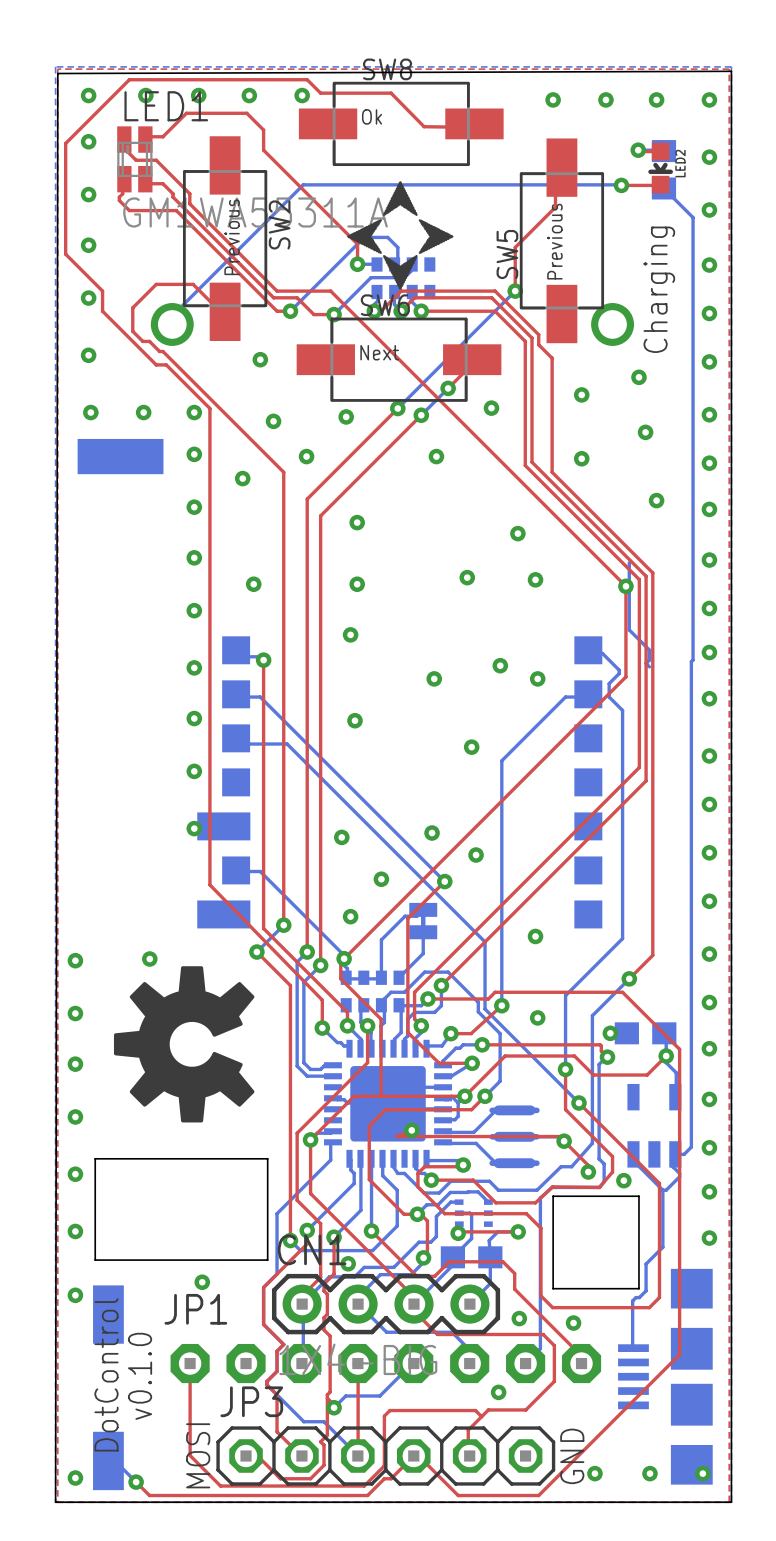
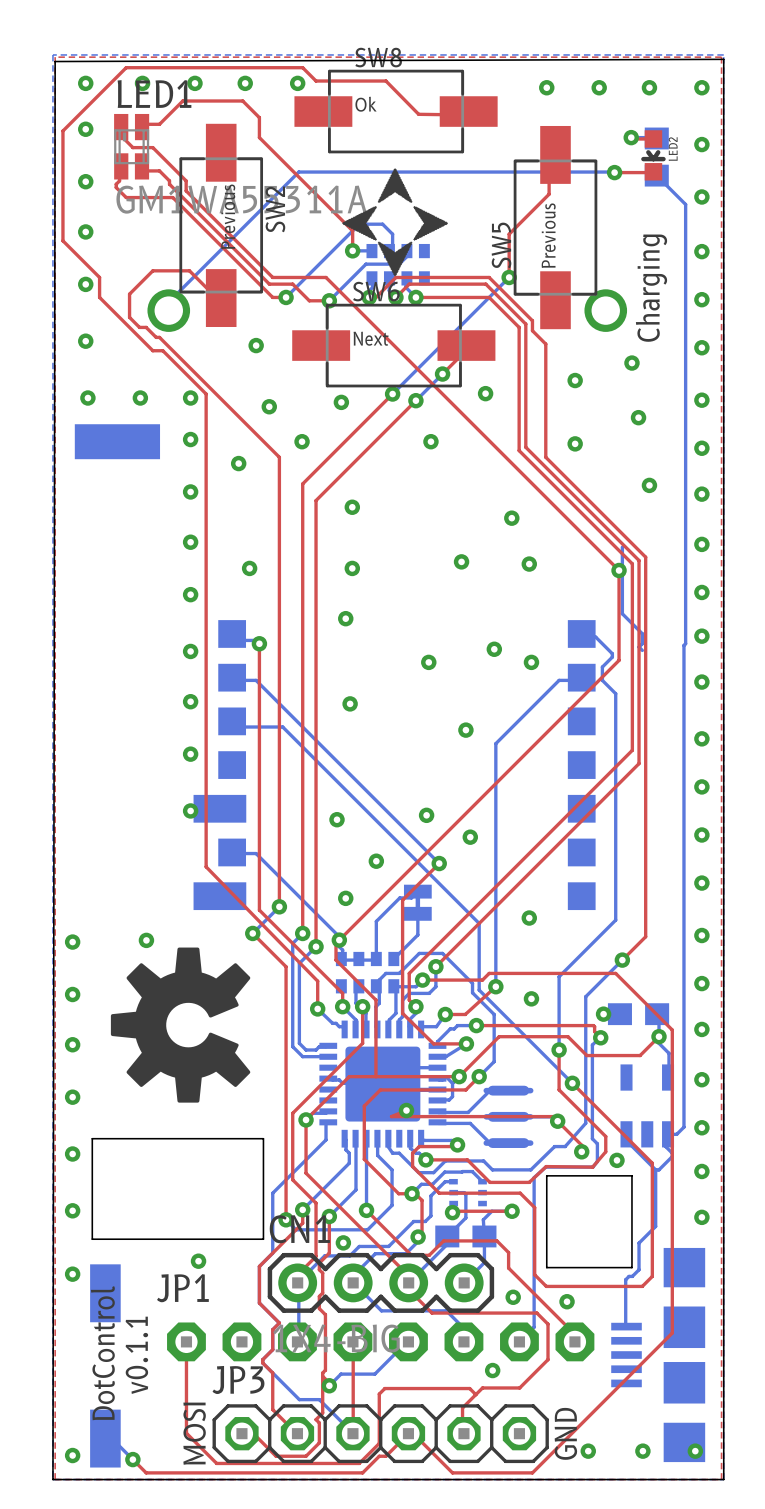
text: v0.1.0 (140, 1376) -> v0.1.1 (136, 1355)

